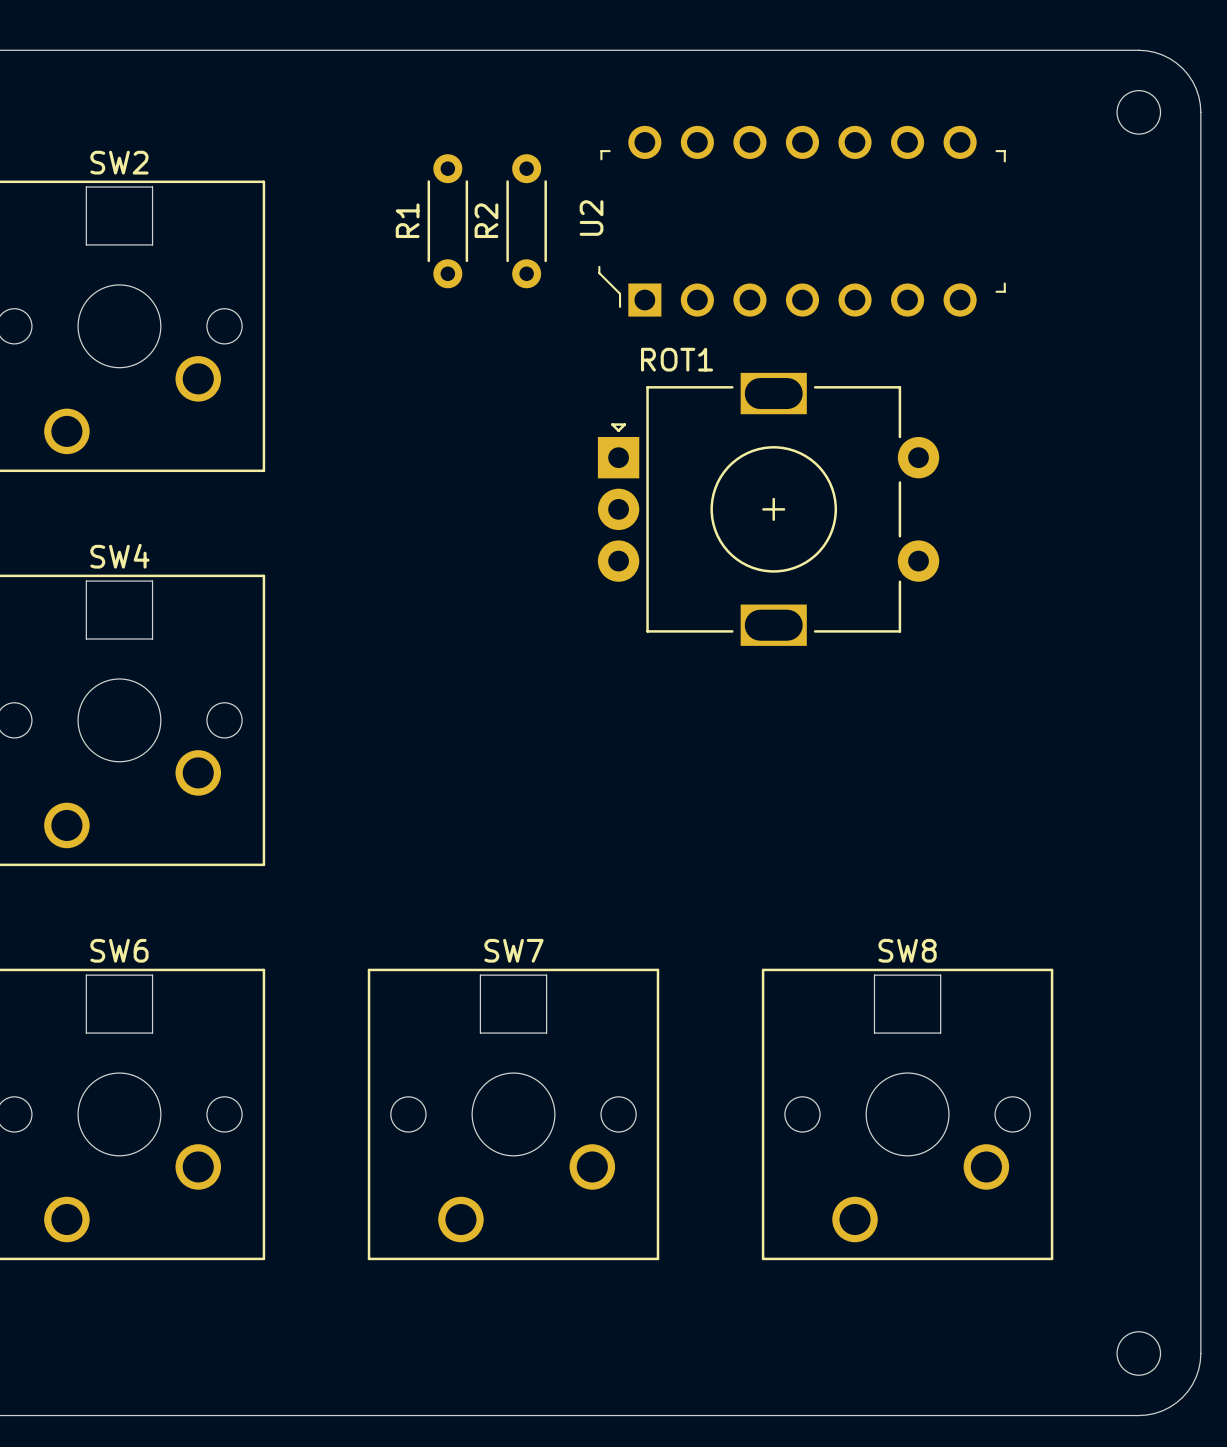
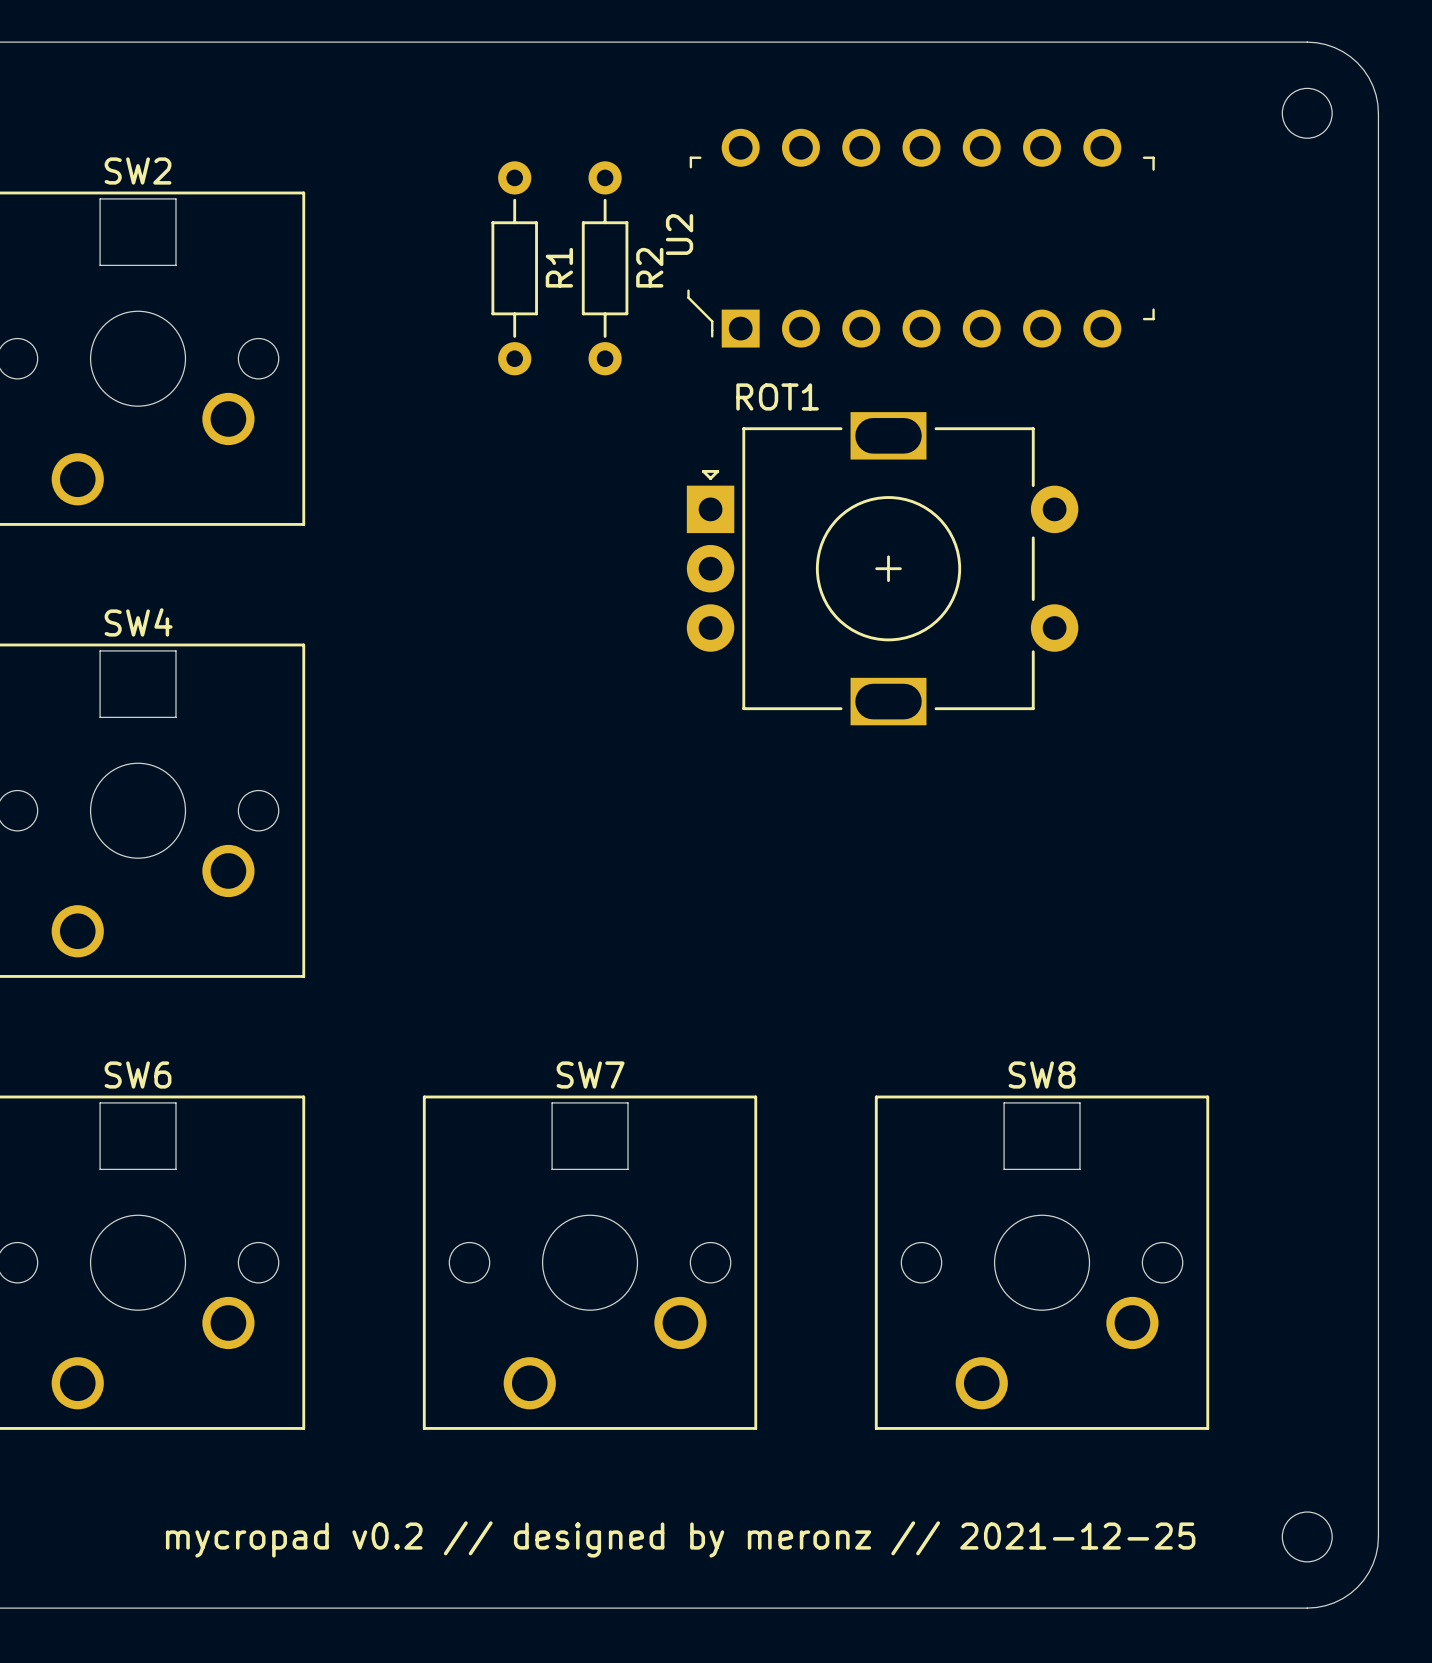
R1 footprint: [427, 154, 469, 289] -> [491, 161, 538, 376]
R2 footprint: [506, 154, 547, 289] -> [581, 161, 629, 376]
R1 name position: R1 (407, 220) -> R1 (559, 267)
R2 name position: R2 (486, 220) -> R2 (649, 267)
text: none -> mycropad v0.2 // designed by meronz // 2021-12-25 (680, 1539)

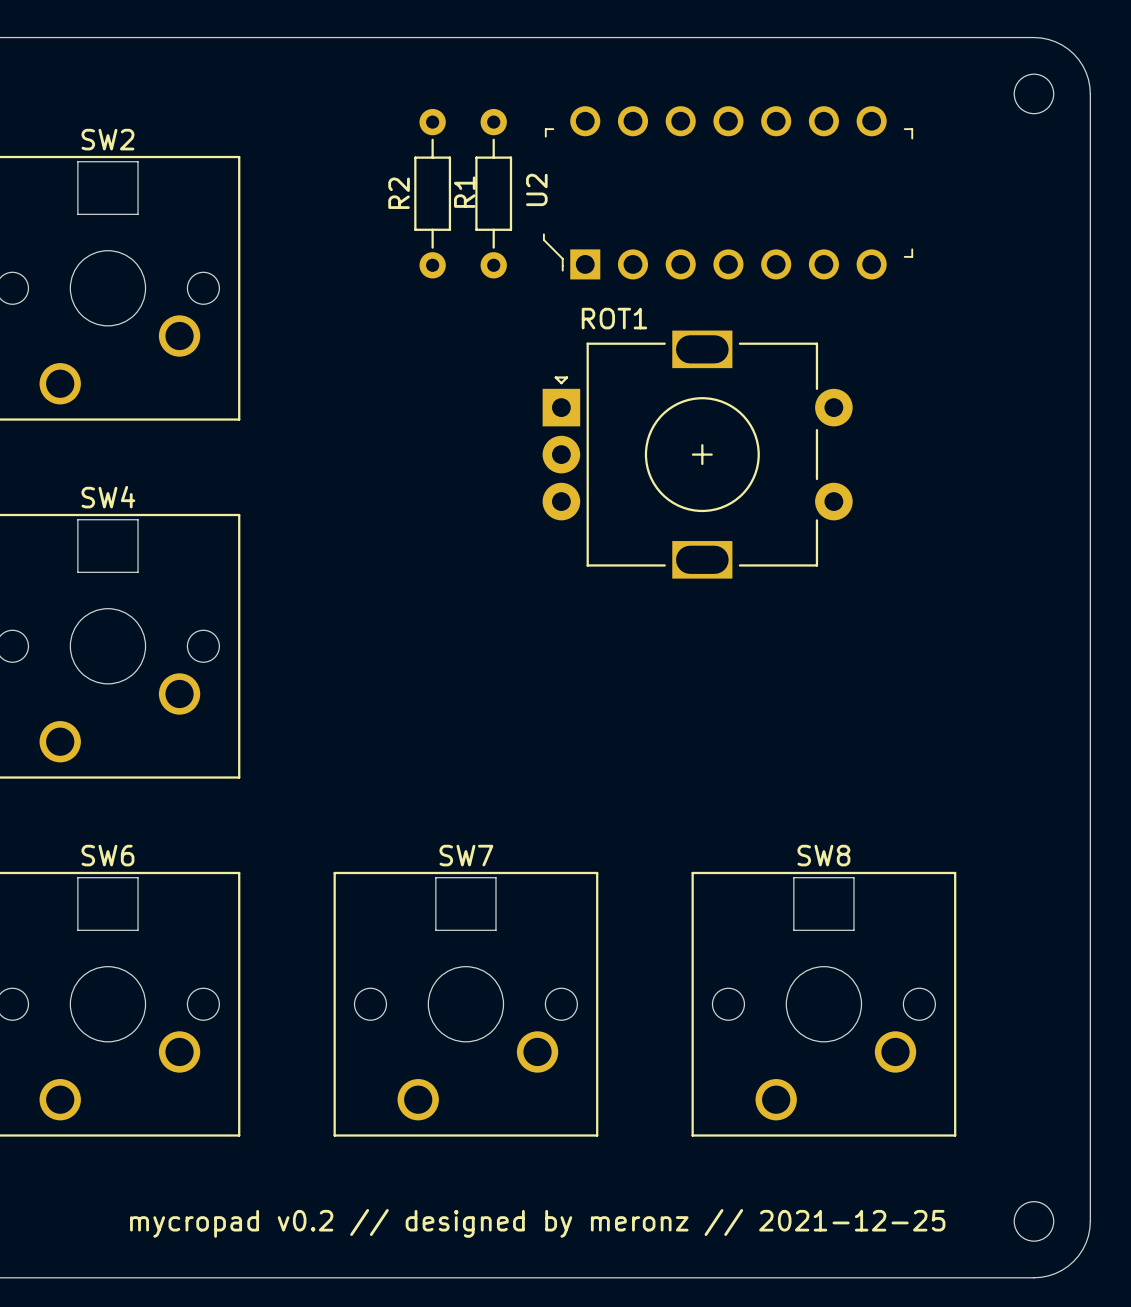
R1 name position: R1 (559, 267) -> R1 (464, 192)
R2 name position: R2 (649, 267) -> R2 (399, 193)
R1 position: (514, 268) -> (493, 193)
R2 position: (605, 268) -> (432, 193)

